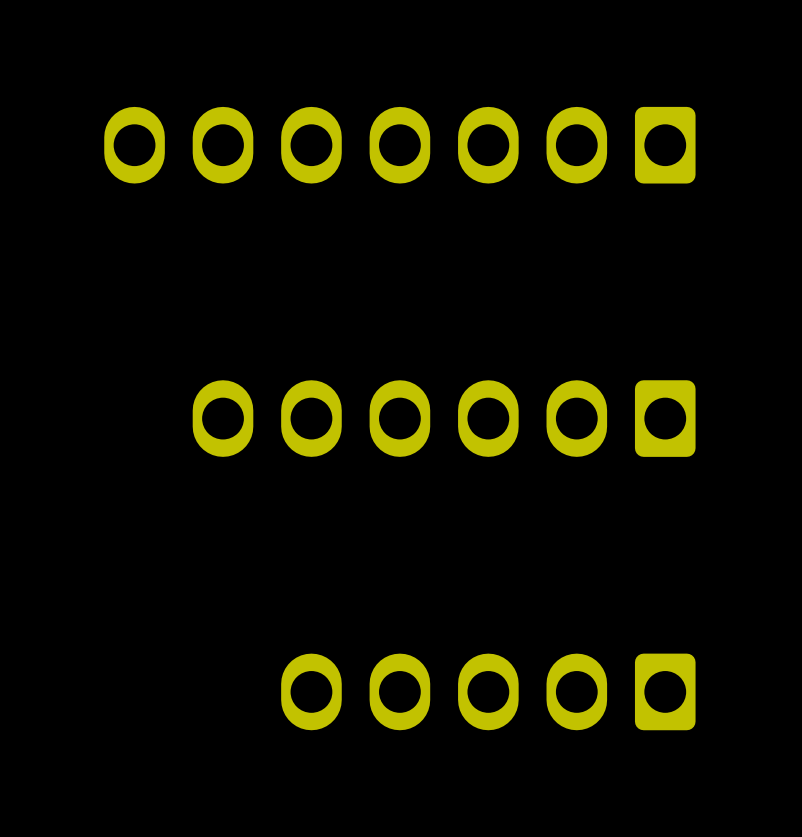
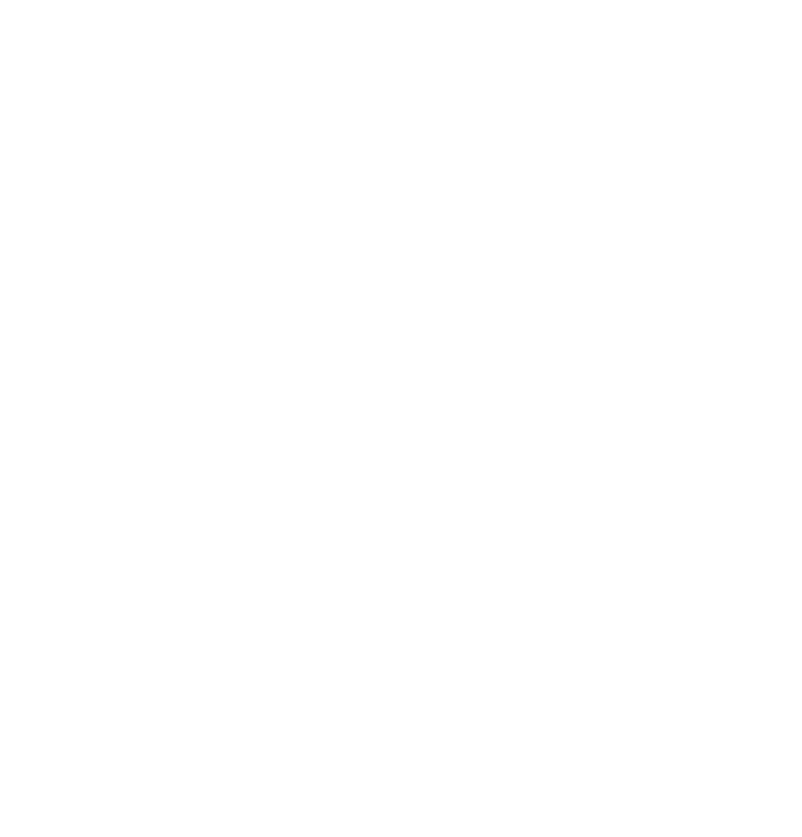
part: (399, 145) -> none
part: (444, 418) -> none
part: (488, 691) -> none

